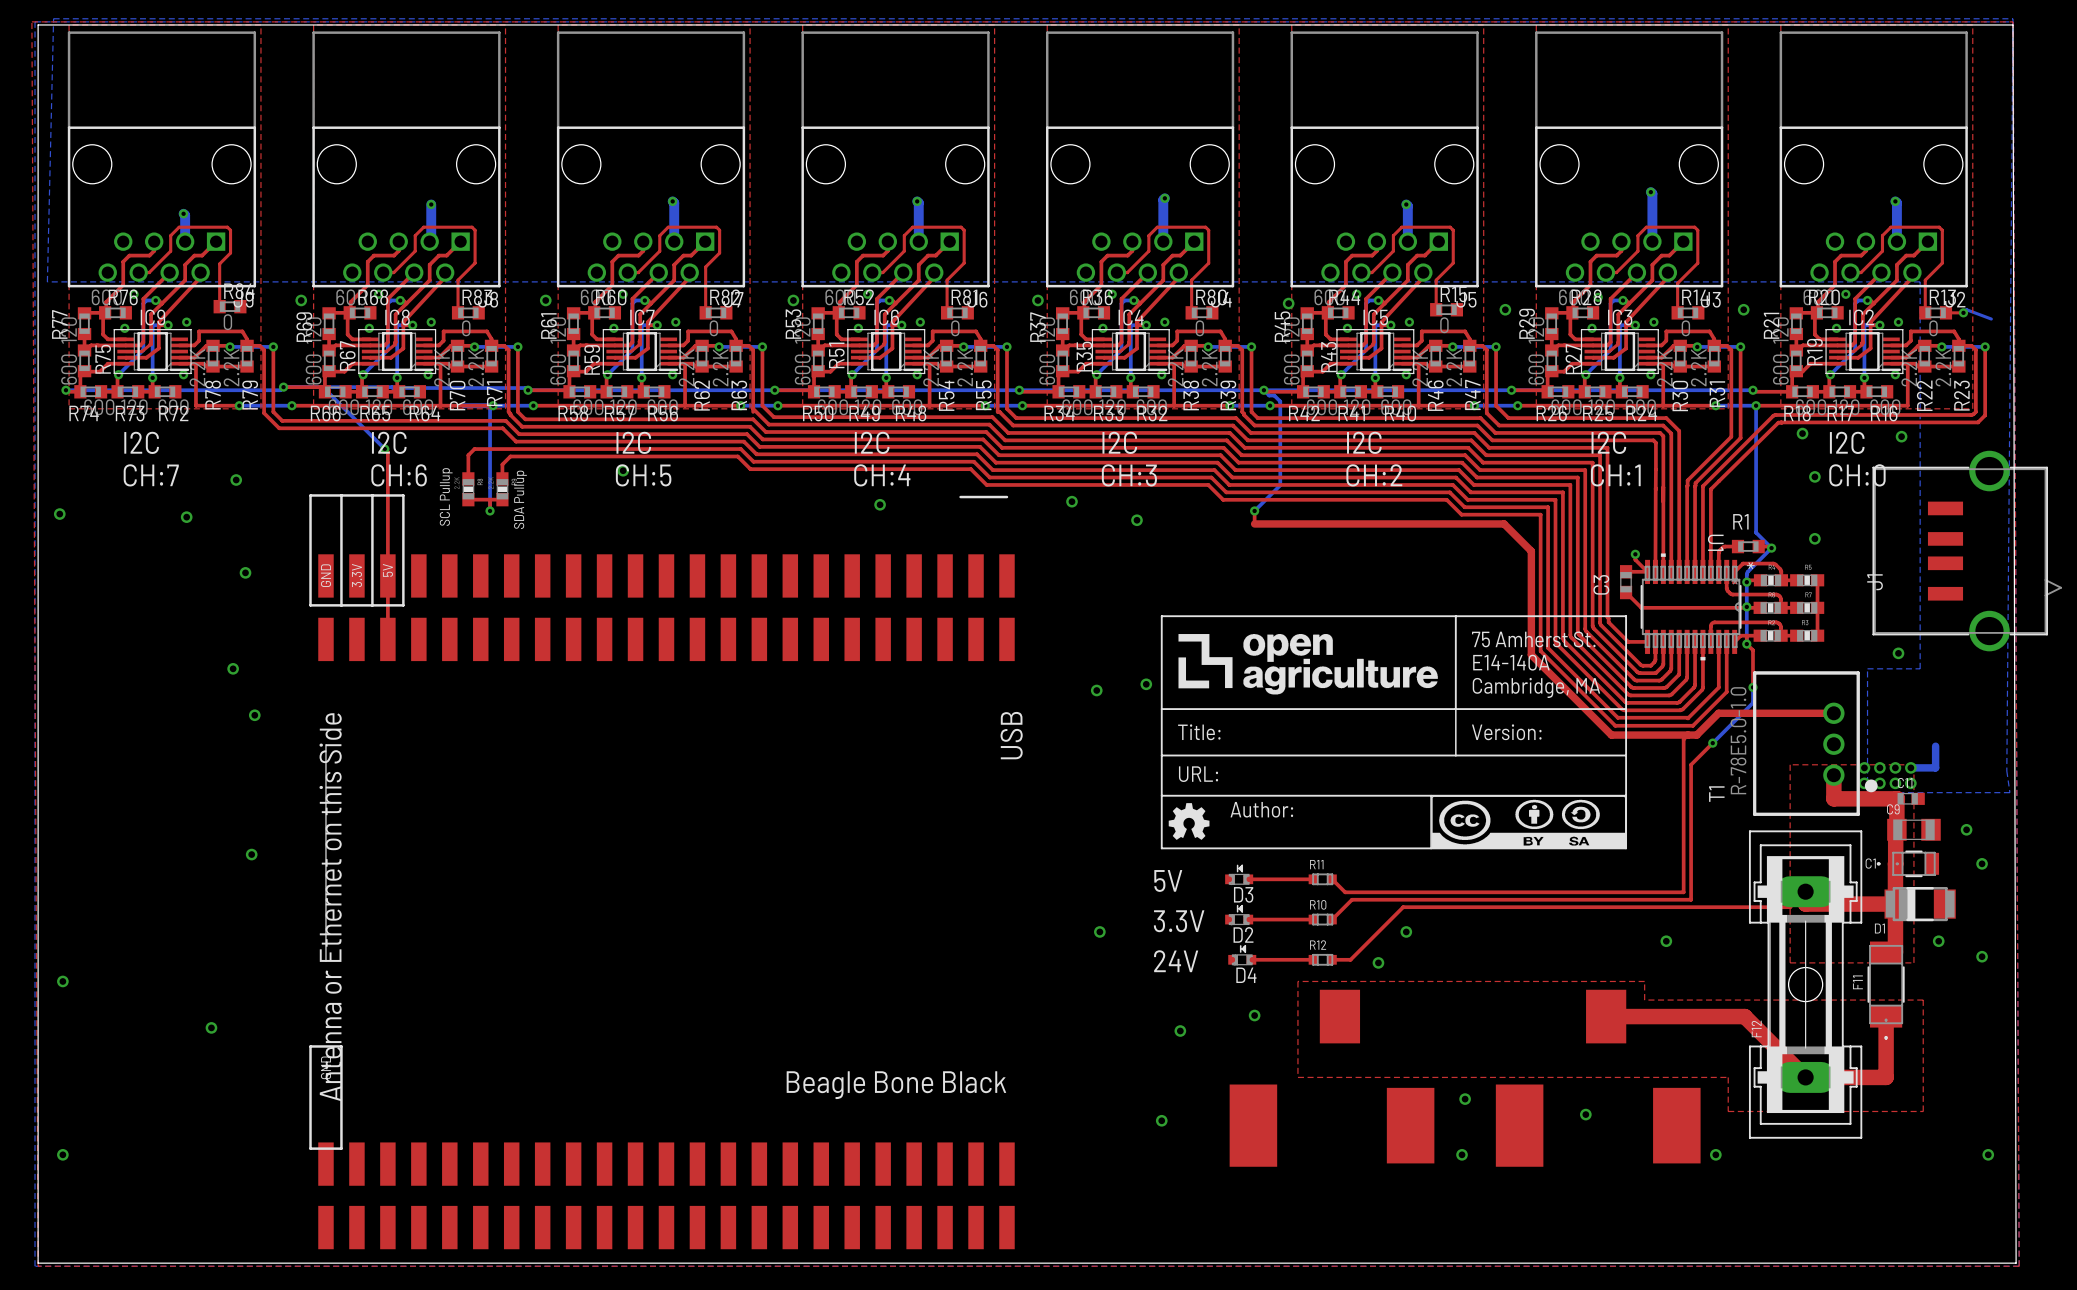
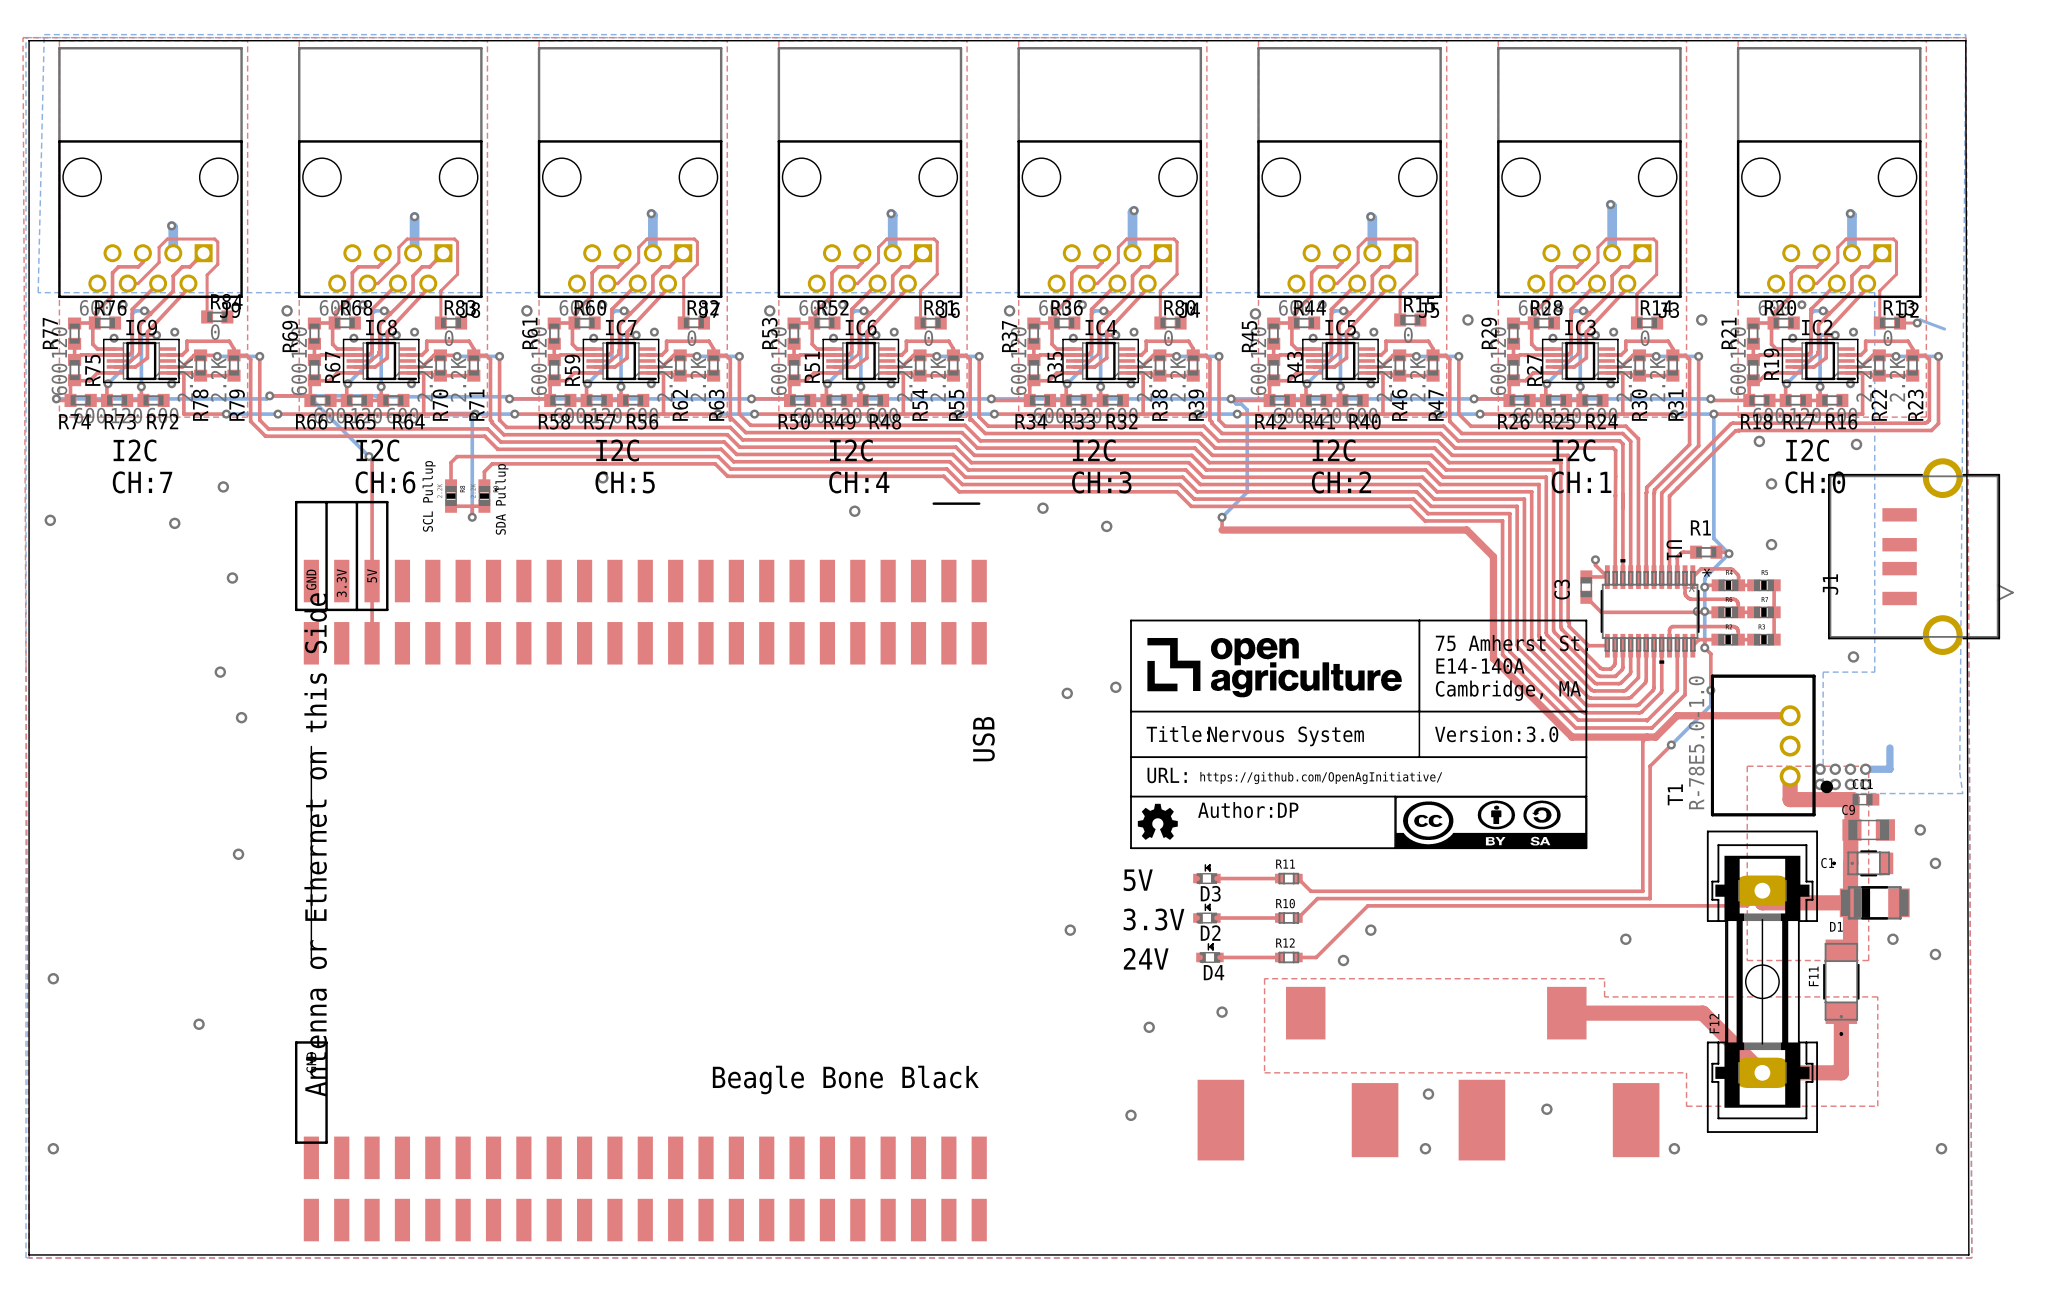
drawing shape: [1160, 615, 1628, 850] -> [1130, 619, 1589, 850]

